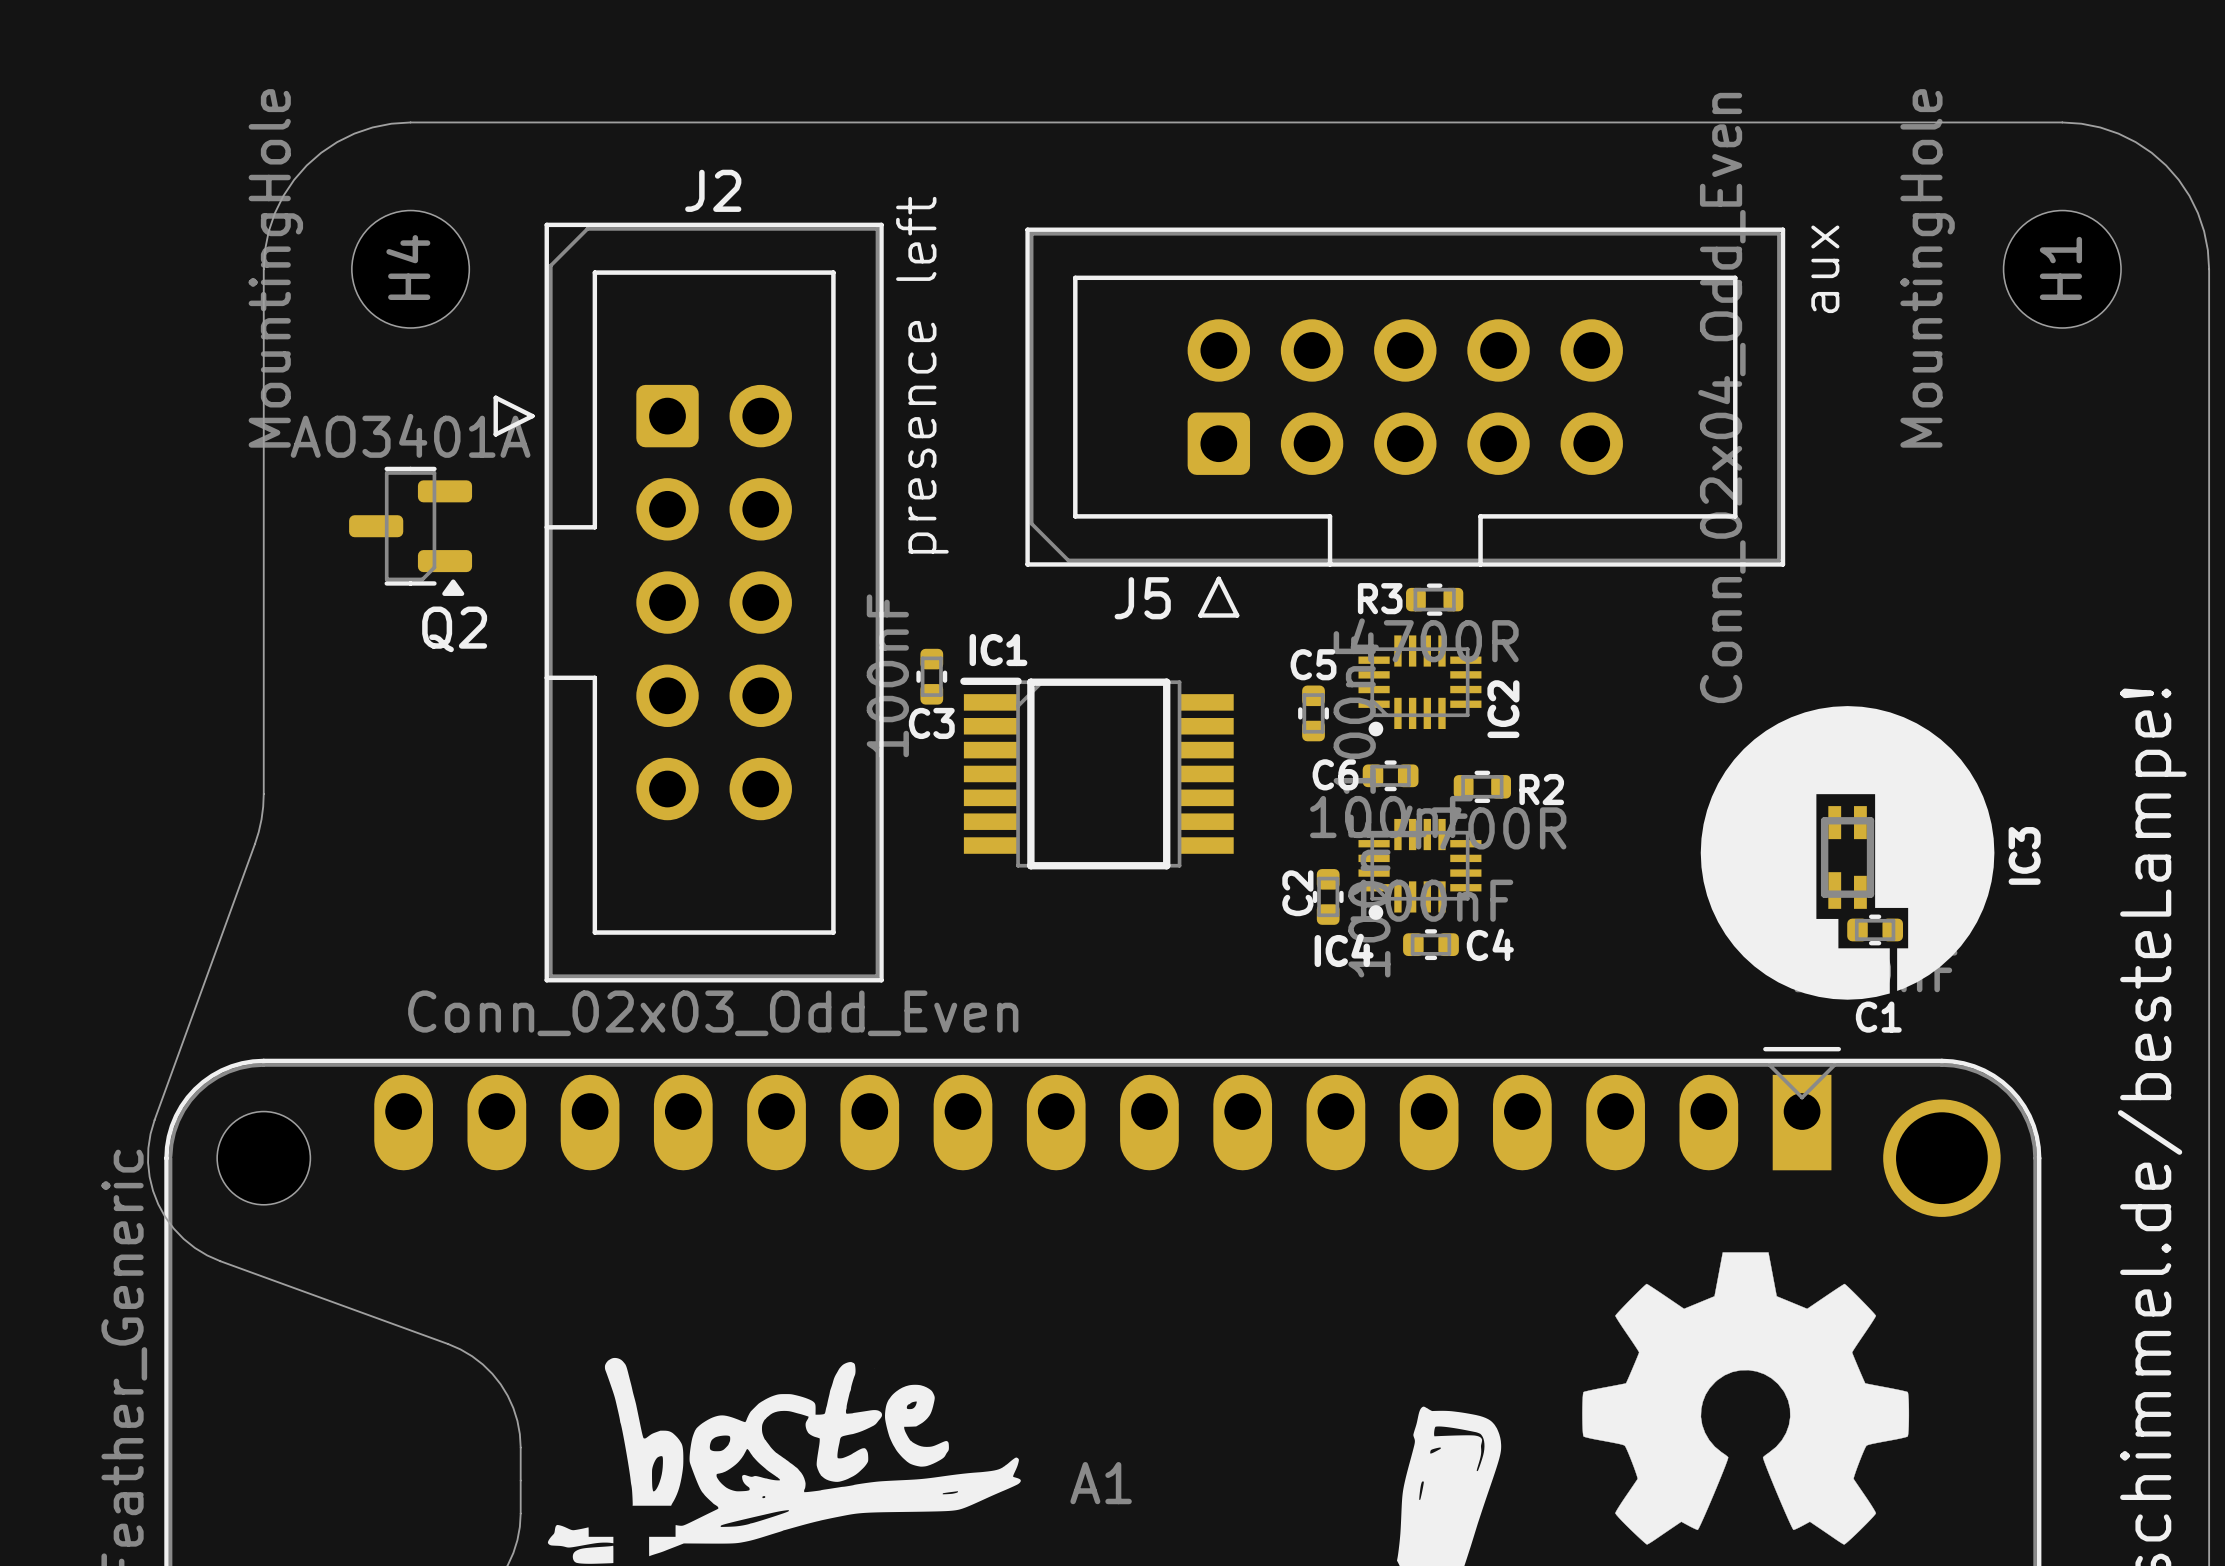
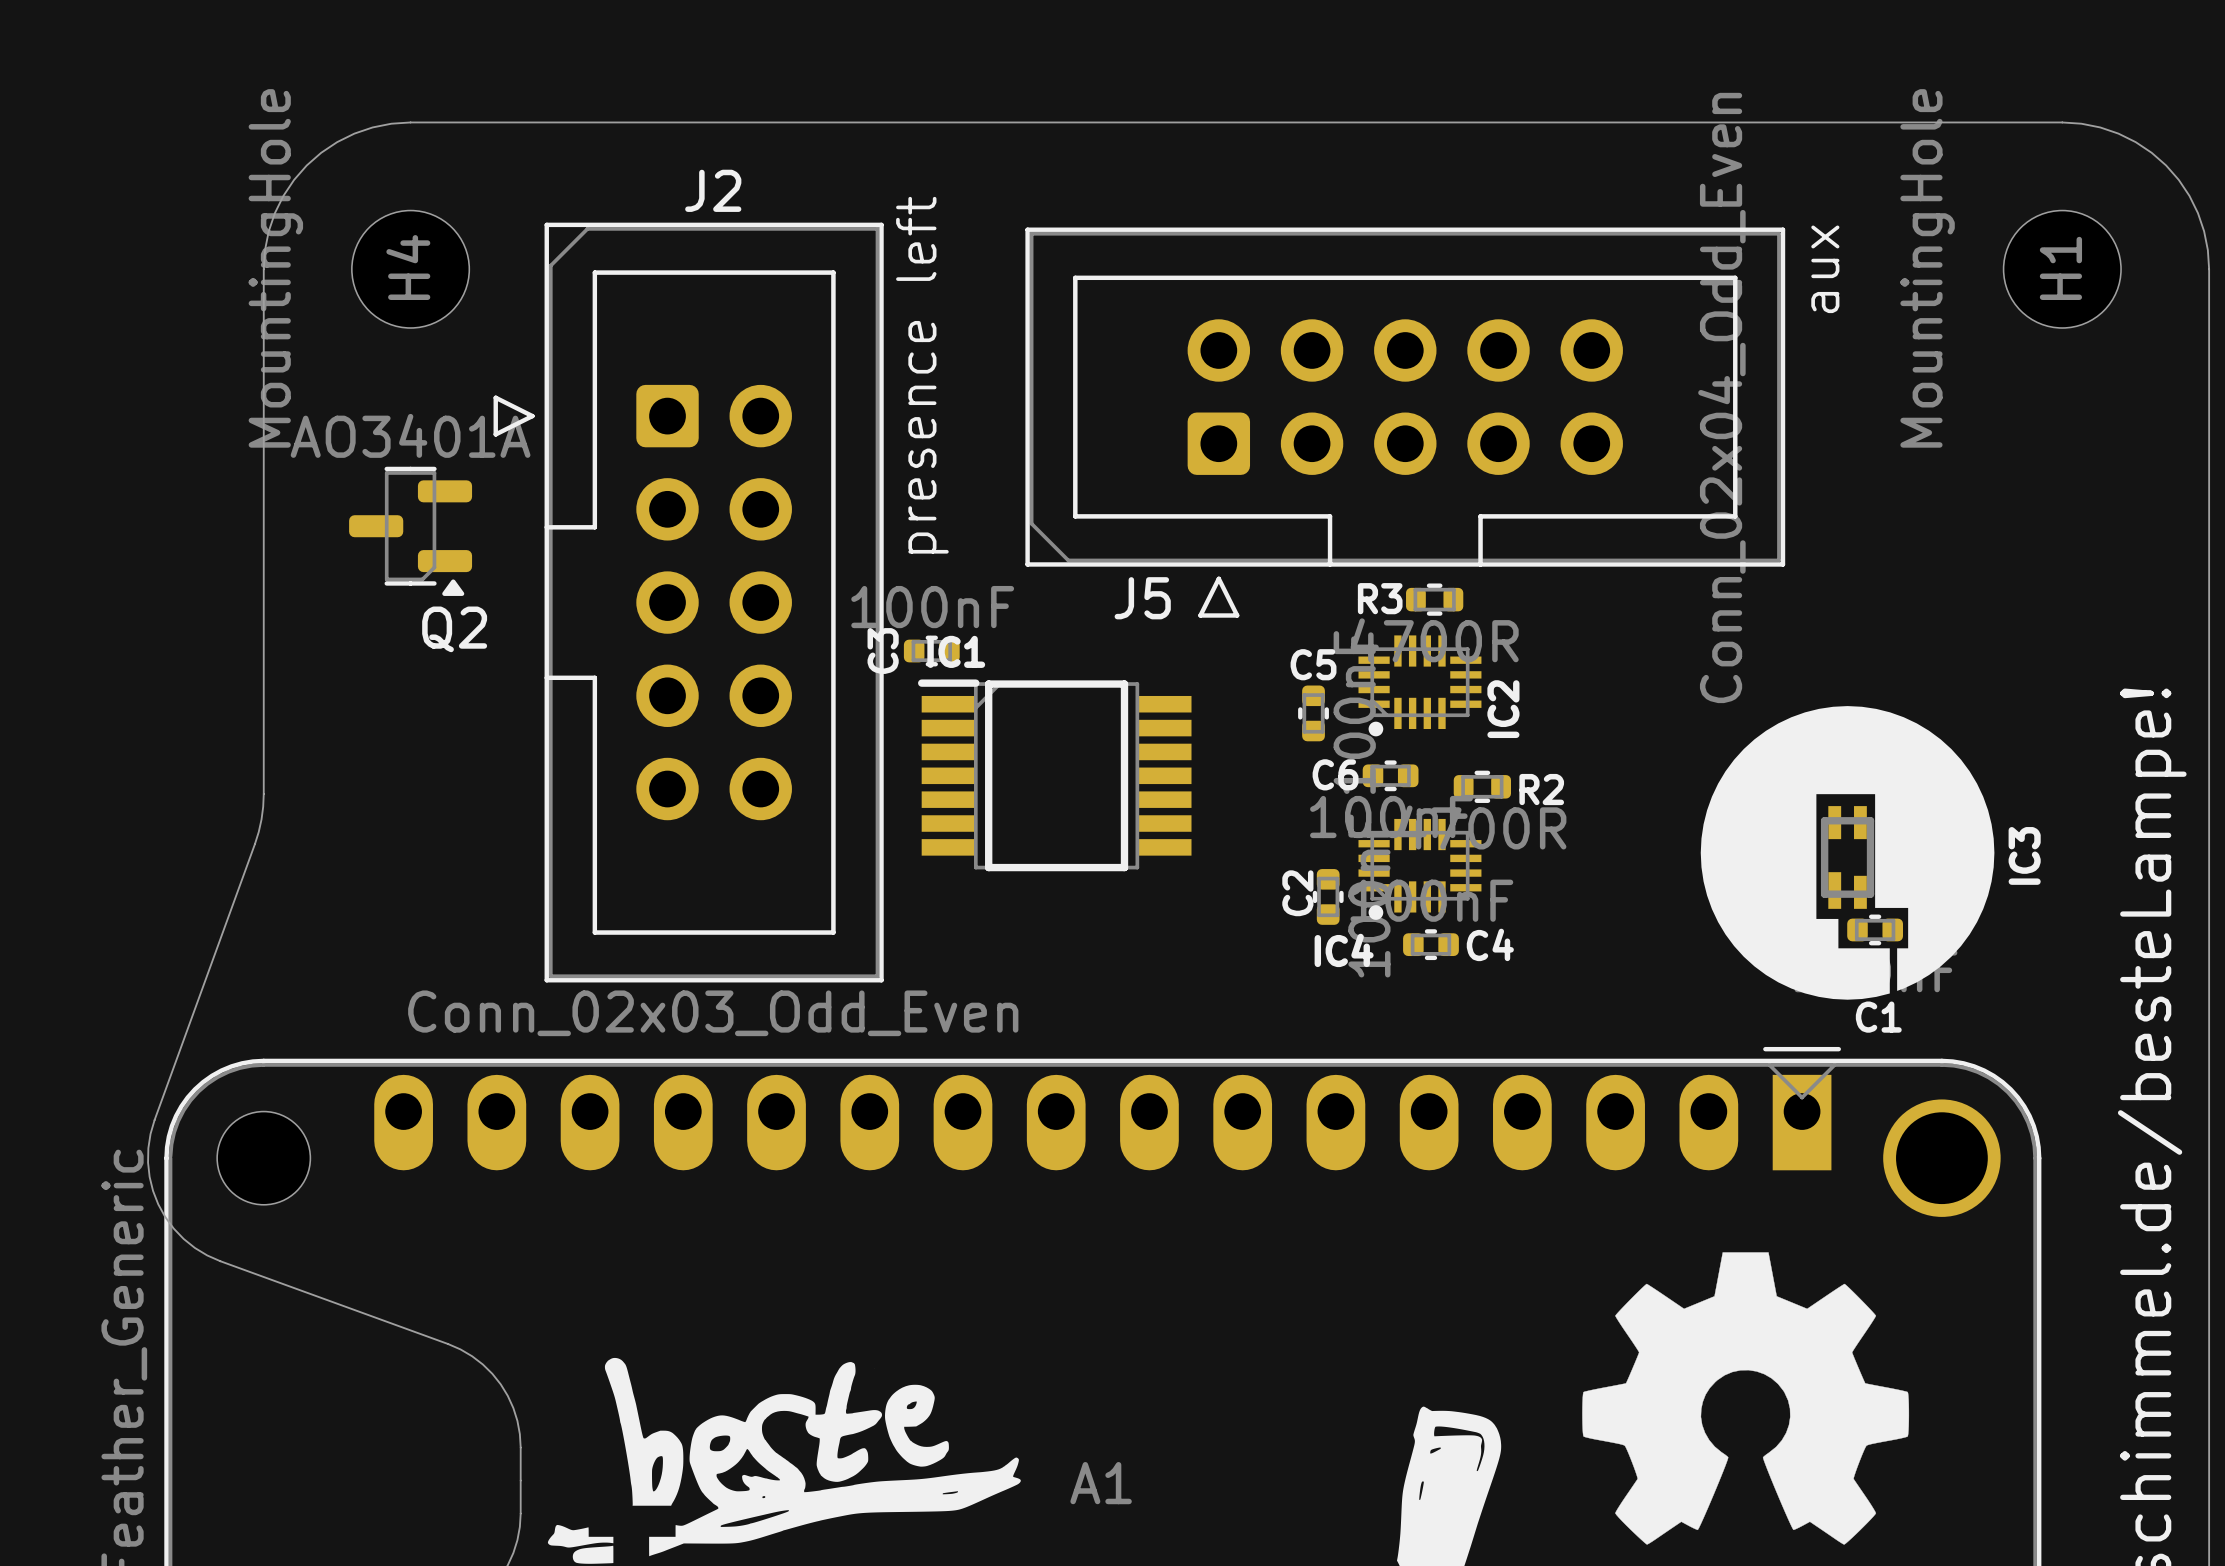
C3 rotation: 0° (931, 676) -> 90° clockwise (931, 651)
IC1 position: (1096, 773) -> (1054, 775)

